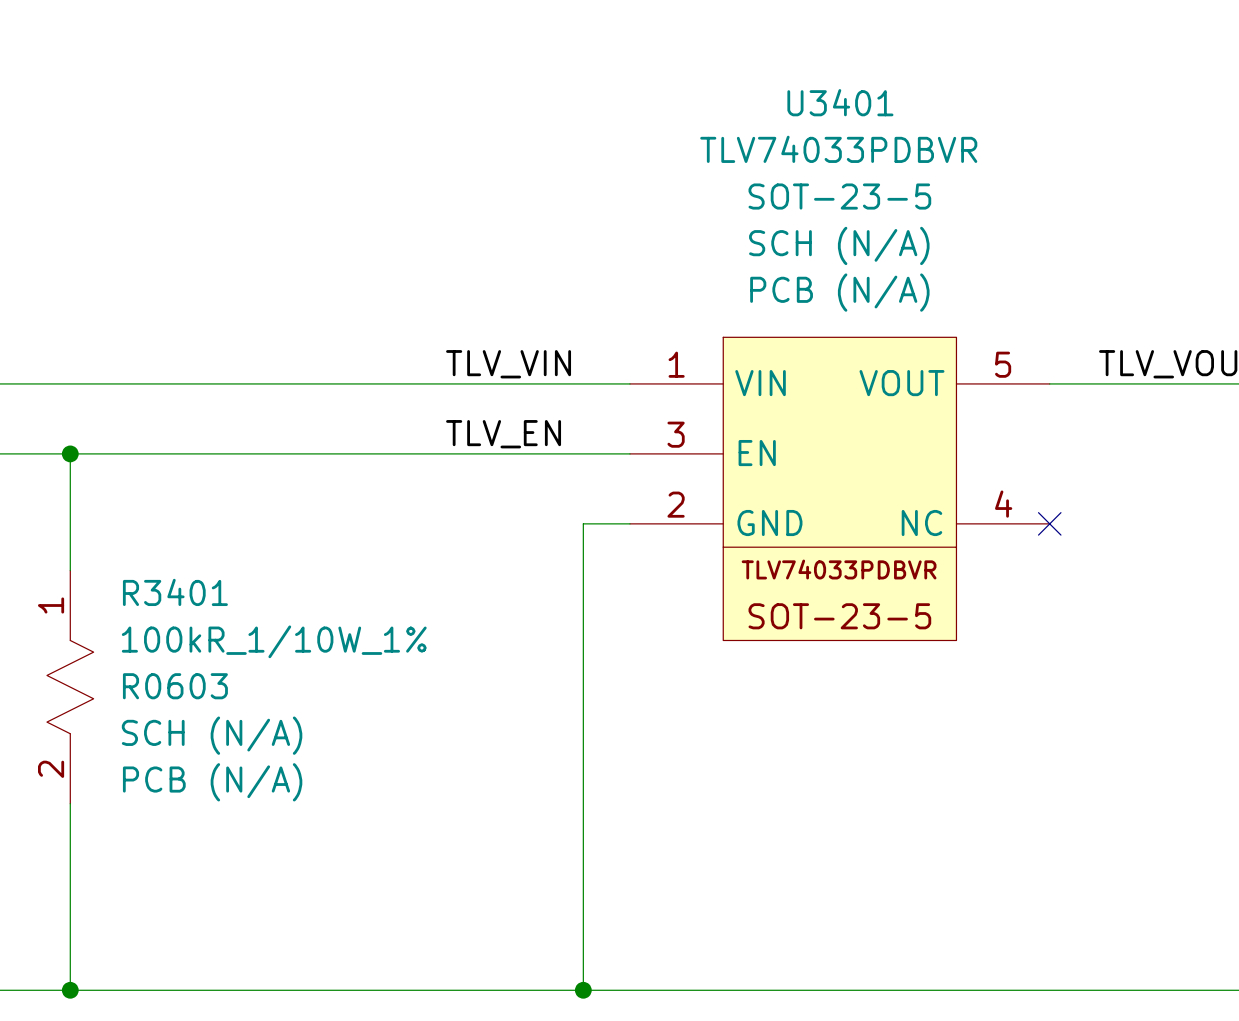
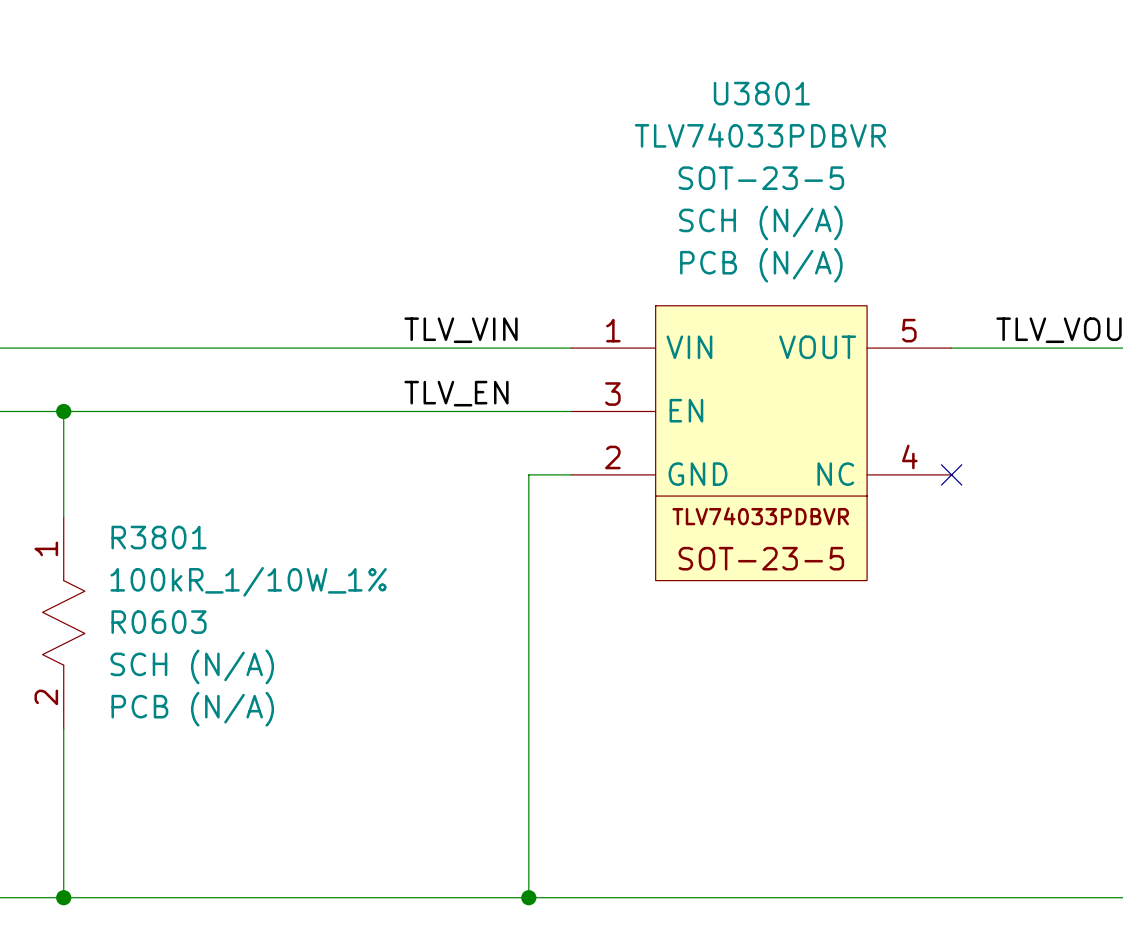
U3401 name: U3401 (840, 102) -> U3801 (761, 93)
R3401 name: R3401 (175, 592) -> R3801 (159, 537)

